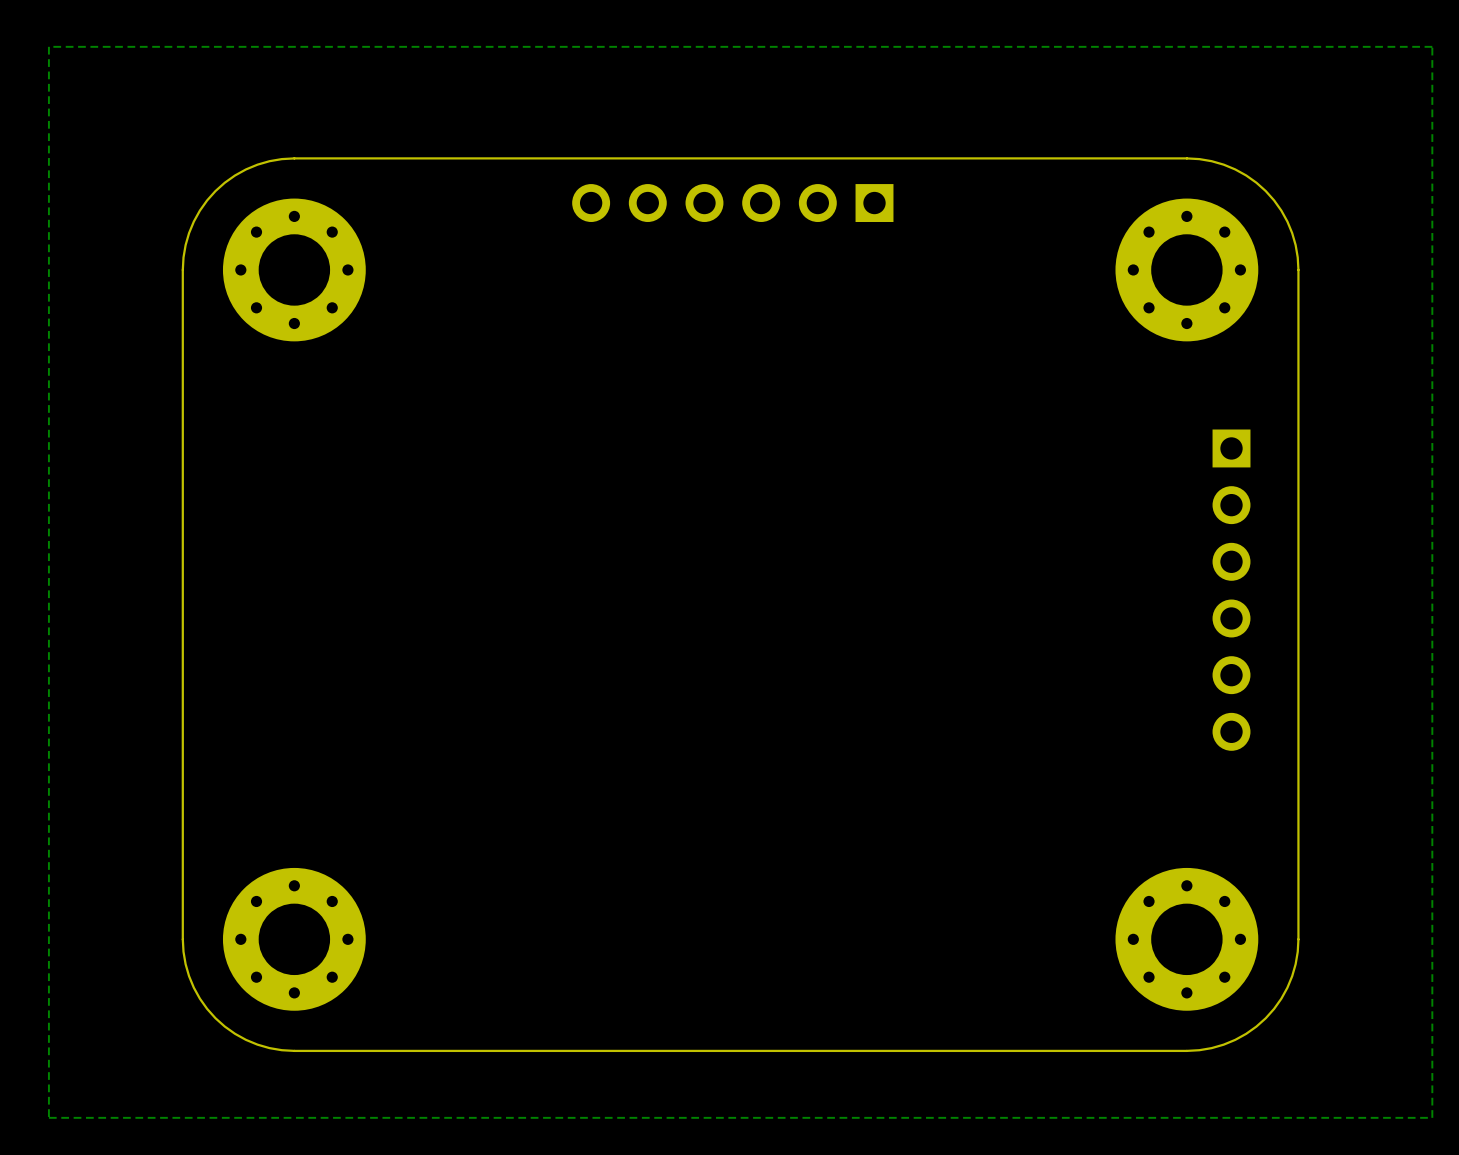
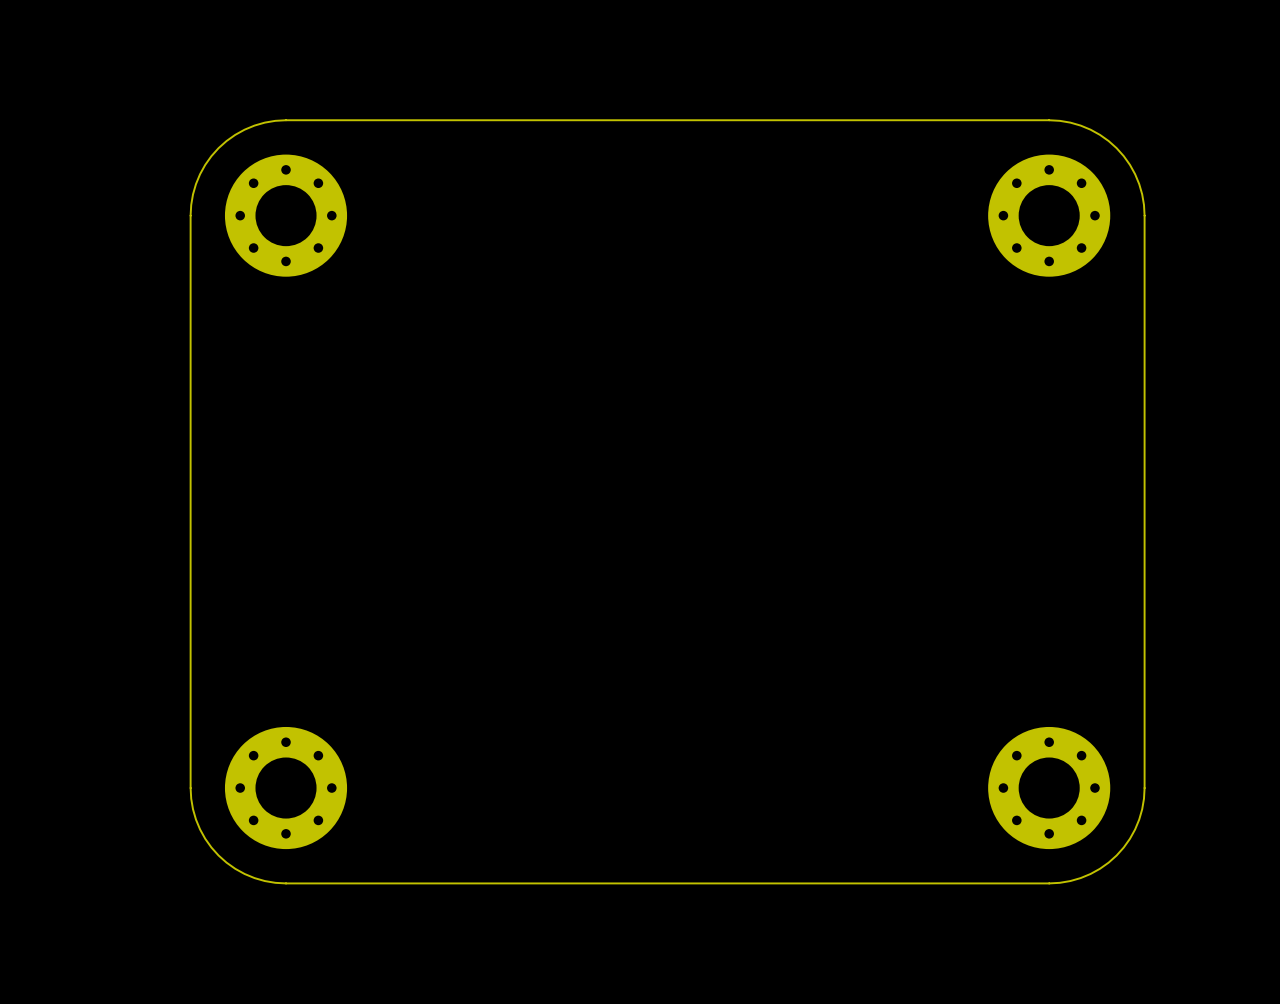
zone outline: (1432, 46) (1432, 1117) (48, 1117) (48, 46) (1432, 46) -> none
part: (732, 203) -> none
part: (1231, 590) -> none

